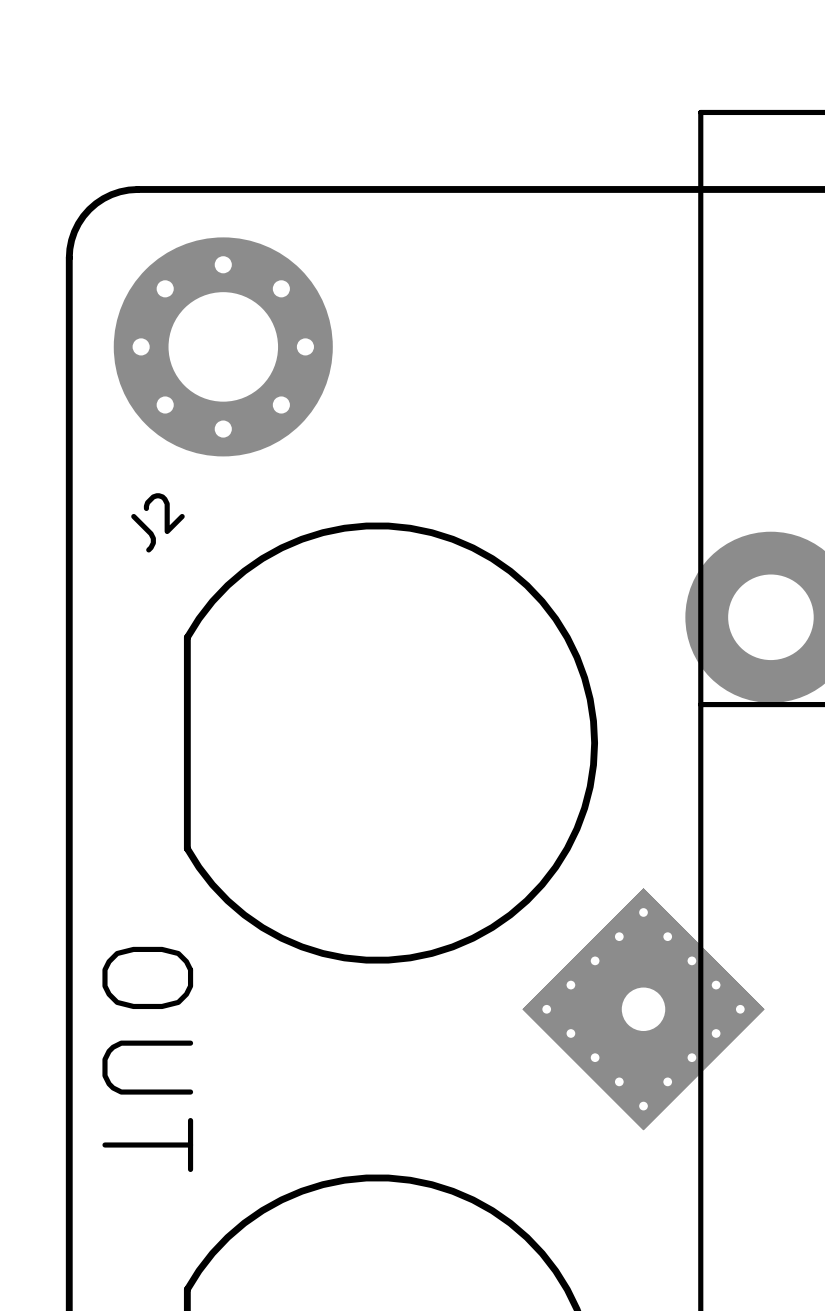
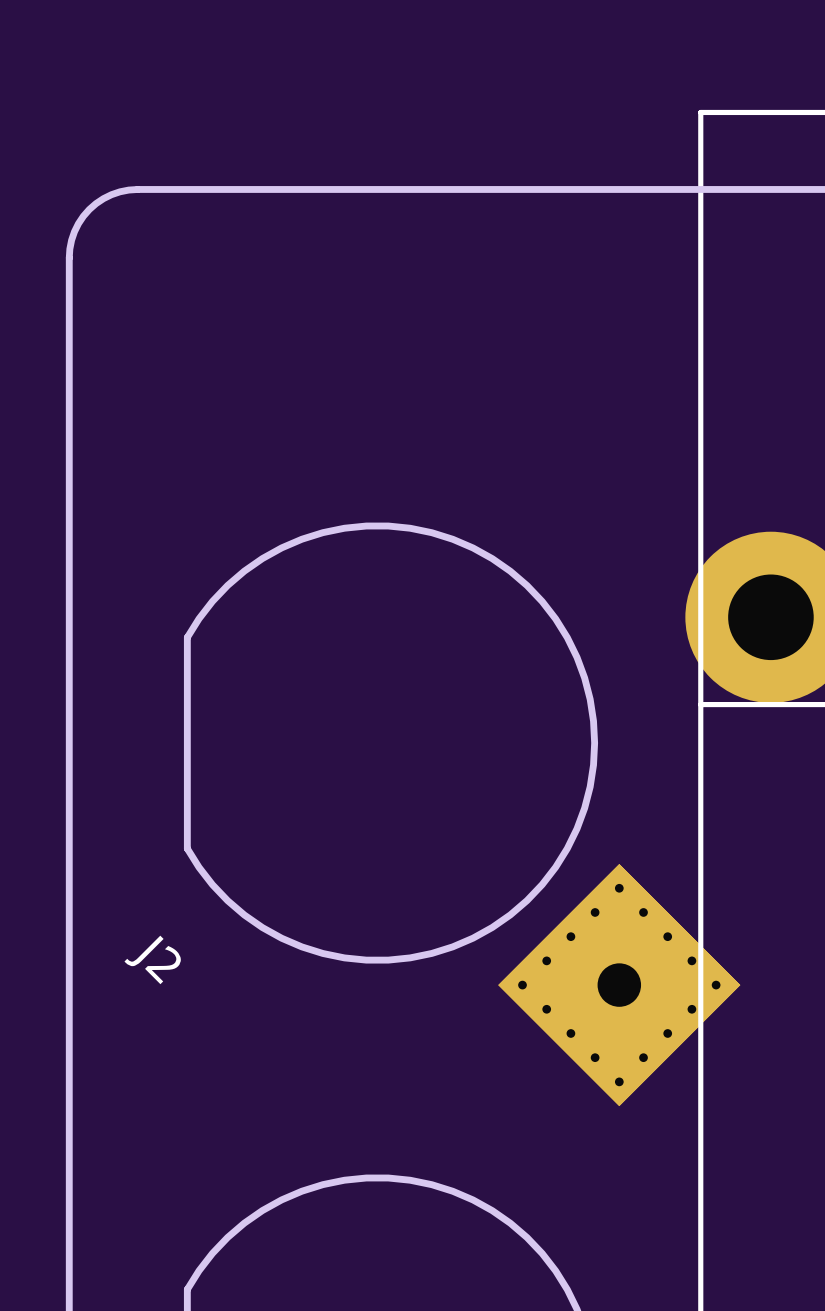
part: (223, 346) -> none
J2 name rotation: 0° (157, 522) -> 90° clockwise (152, 959)
J2 name position: J2 (157, 522) -> J2 (152, 959)
J2 position: (643, 1009) -> (619, 985)
text: OUT (147, 1059) -> none

